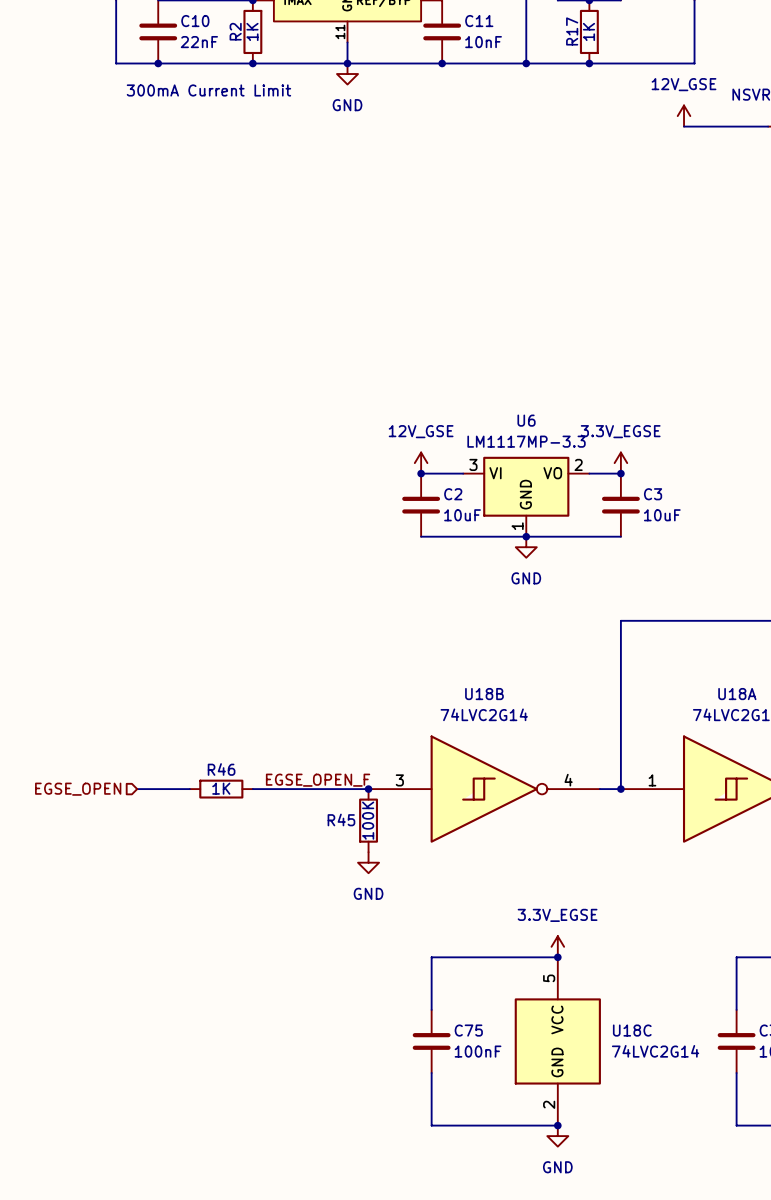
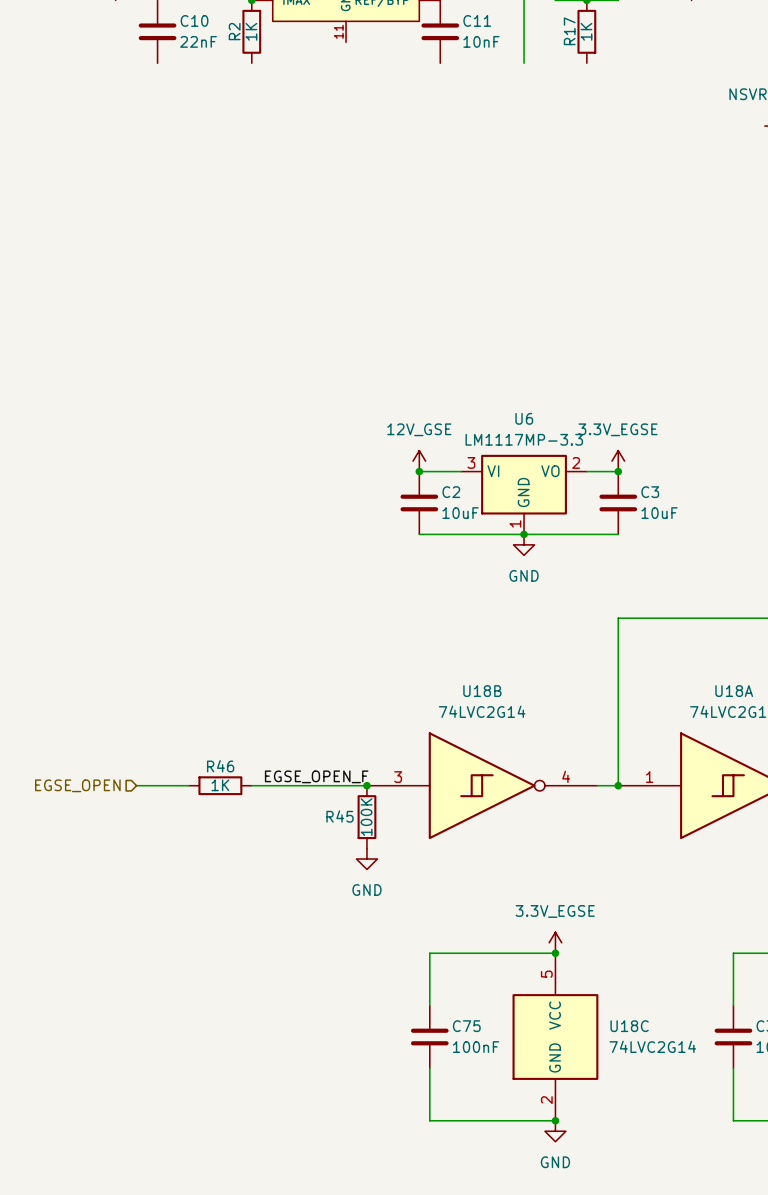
wire: (116, 0) (116, 63) (694, 63) (694, 0) -> none
wire: (158, 0) (252, 0) -> none
wire: (347, 42) (347, 63) -> none
junction: (158, 63) -> none
junction: (252, 63) -> none
junction: (347, 63) -> none
junction: (442, 63) -> none
junction: (526, 63) -> none
junction: (589, 63) -> none
power symbol: GND (347, 74) -> none
text: 300mA Current Limit (208, 90) -> none
power symbol: 12V_GSE (684, 116) -> none
wire: (684, 126) (768, 126) -> none

